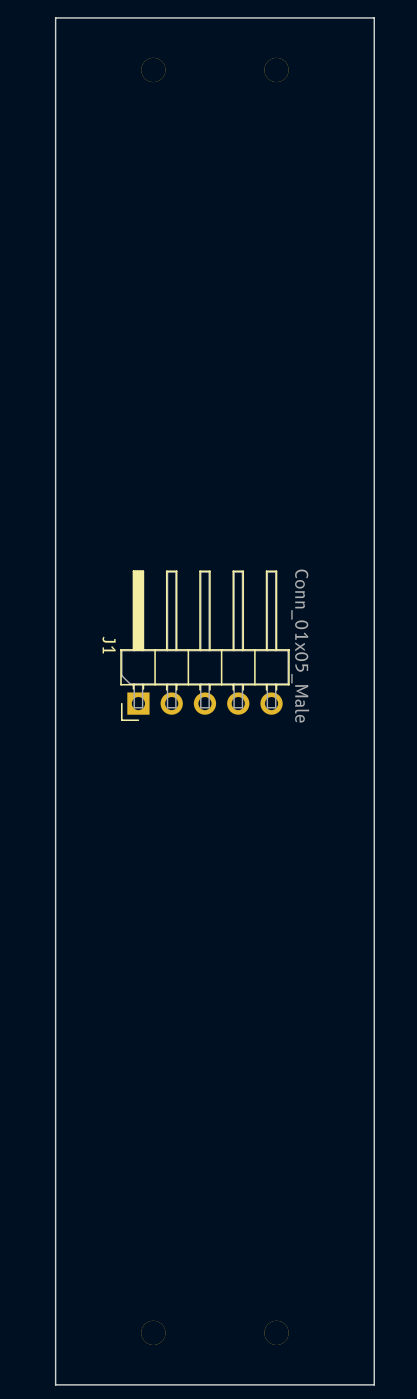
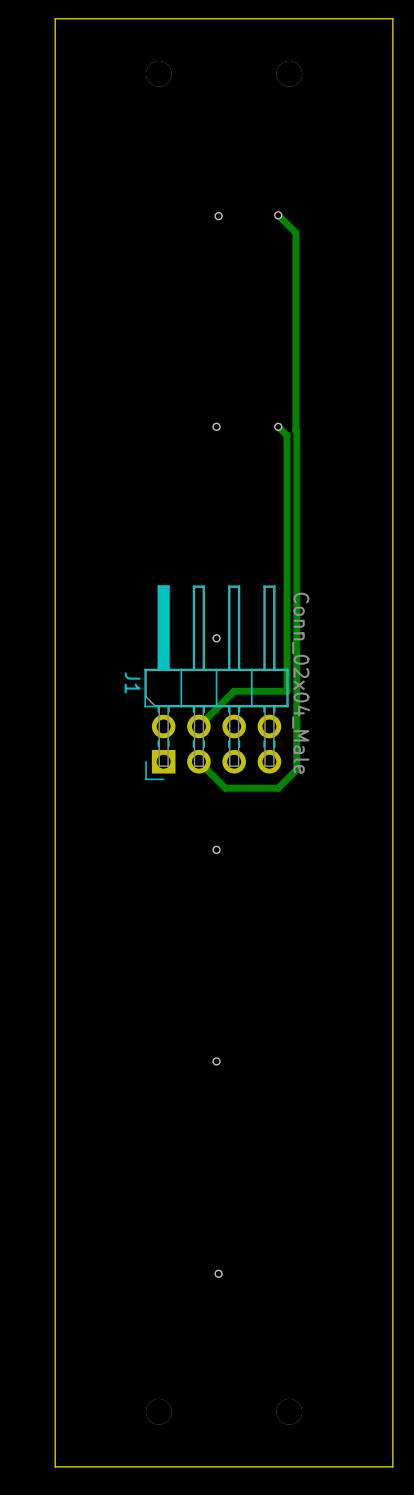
track: none -> (278, 215) (295, 232) (296, 769) (278, 788) (225, 788) (198, 761)
via: none -> (278, 215)
via: none -> (218, 216)
via: none -> (216, 426)
track: none -> (278, 426) (287, 435) (287, 691) (234, 691) (198, 726)
via: none -> (278, 426)
J1 footprint: [120, 570, 290, 722] -> [144, 585, 289, 781]
via: none -> (216, 638)
J1 value: Conn_01x05_Male (300, 646) -> Conn_02x04_Male (301, 683)
via: none -> (216, 849)
via: none -> (216, 1061)
via: none -> (218, 1273)

